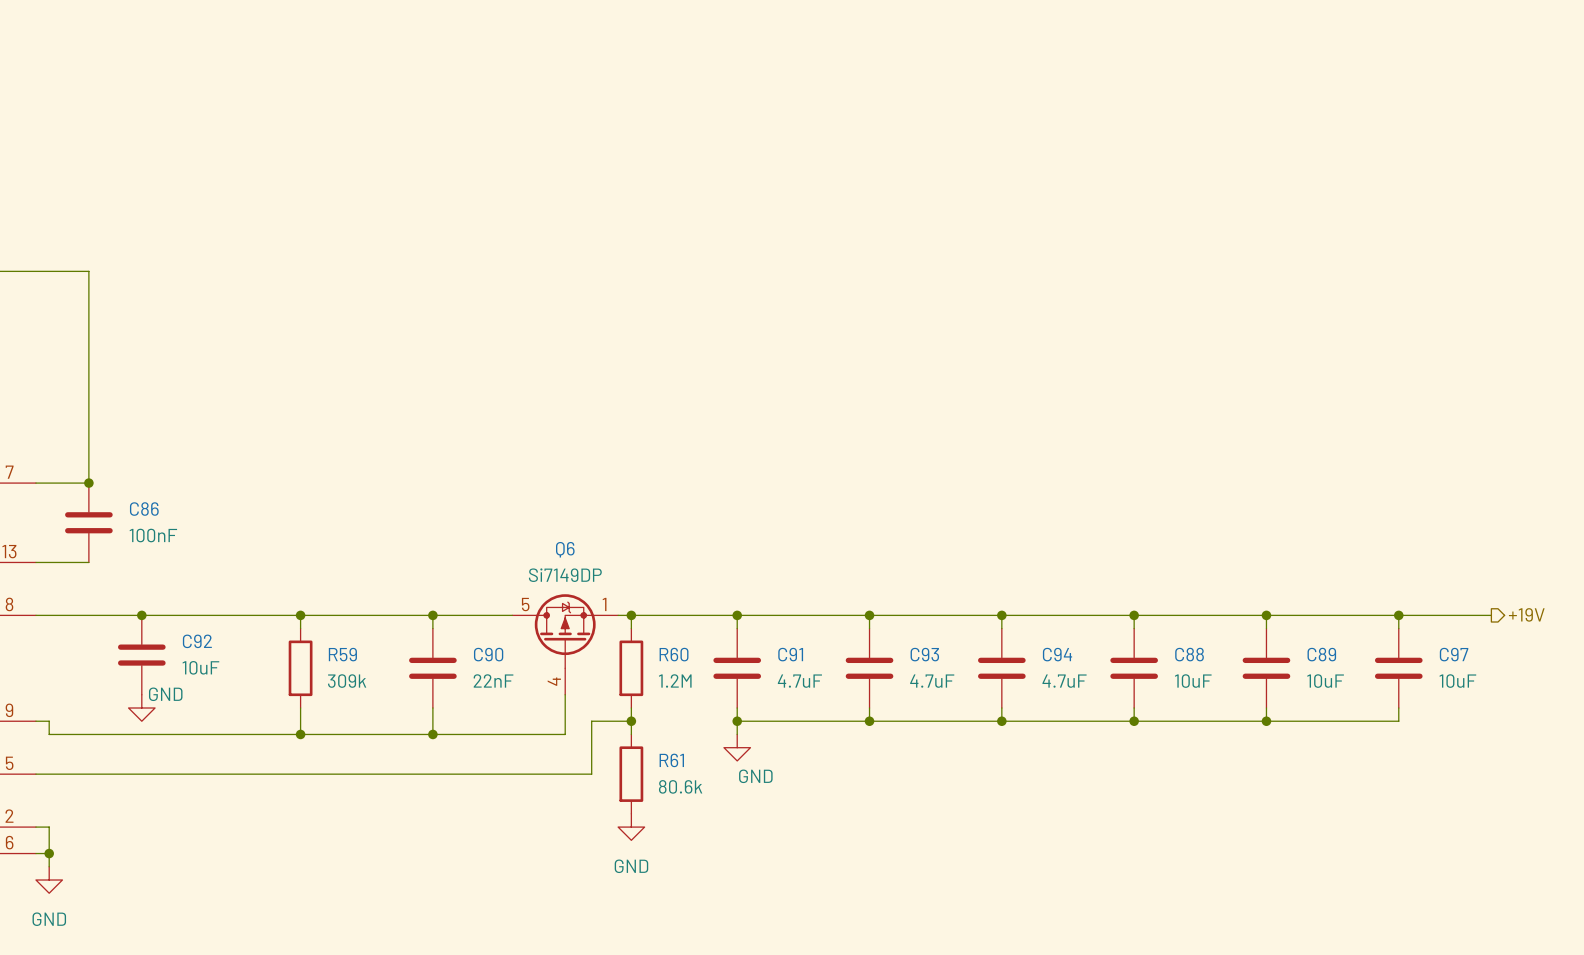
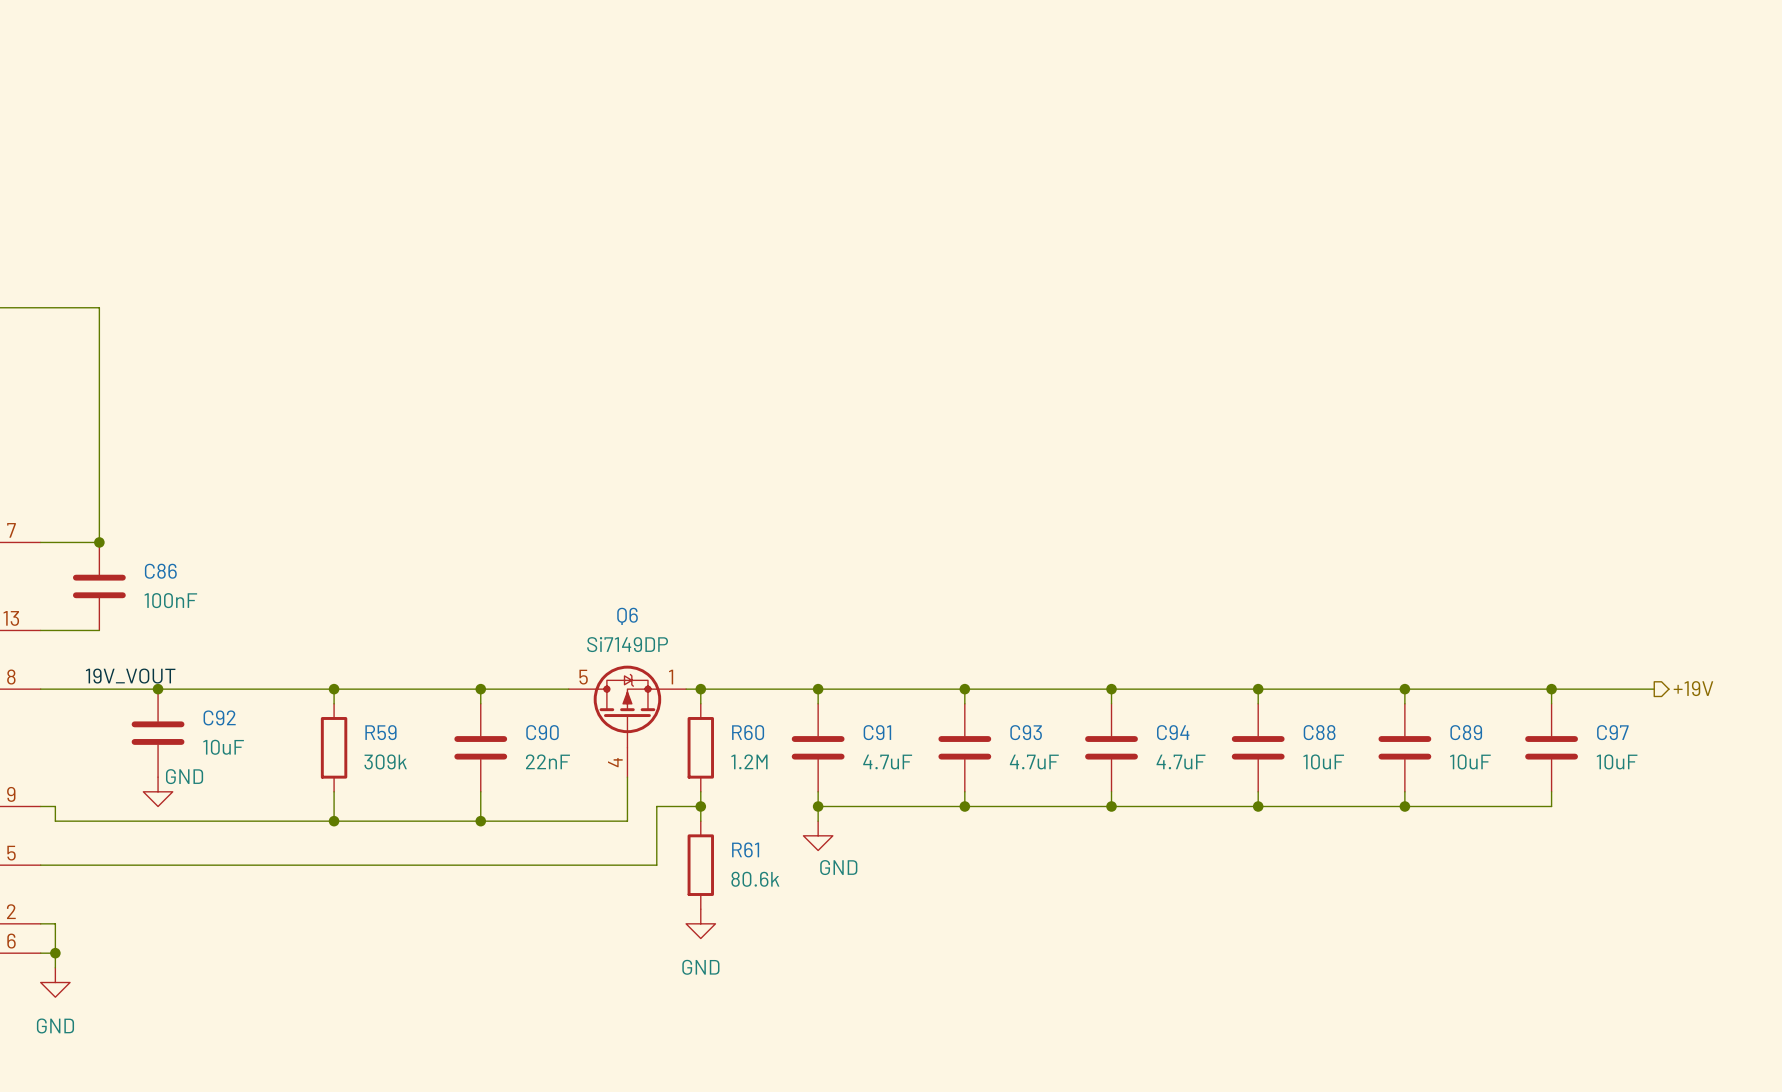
label: none -> 19V_VOUT (130, 676)

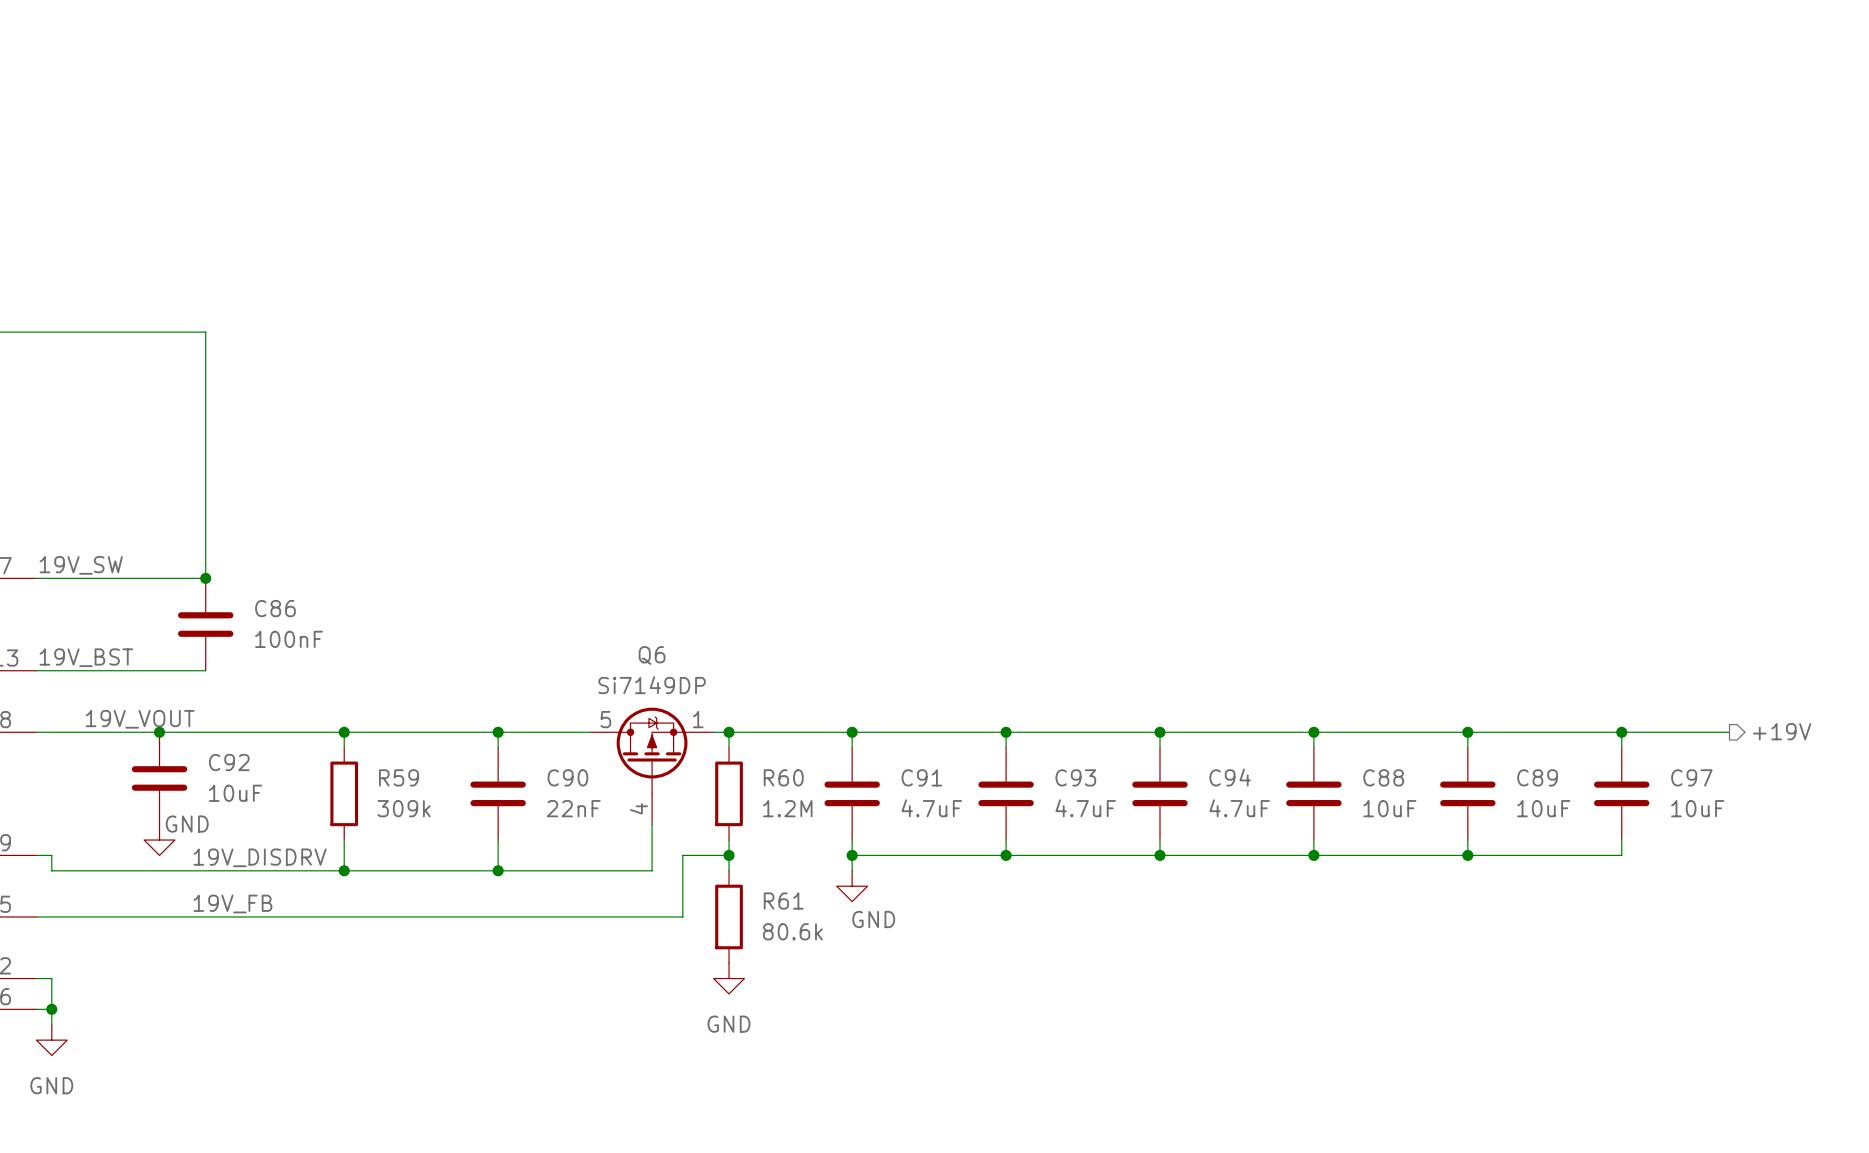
wire: (99, 307) (99, 542) -> (97, 332) (205, 332) (205, 578) (97, 578)
label: none -> 19V_SW (81, 565)
junction: (99, 542) -> none
junction: none -> (205, 578)
C86 position: (99, 586) -> (205, 624)
label: none -> 19V_BST (86, 657)
wire: none -> (97, 670) (205, 670)
label: none -> 19V_DISDRV (260, 857)
label: none -> 19V_FB (232, 903)

